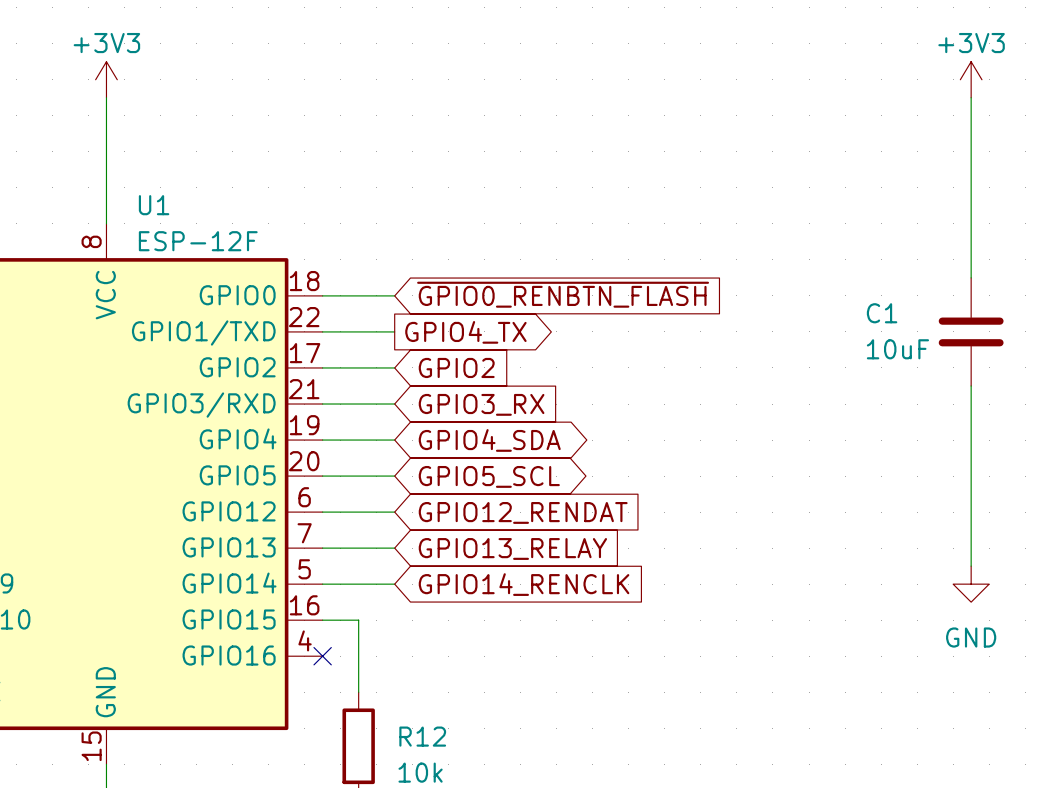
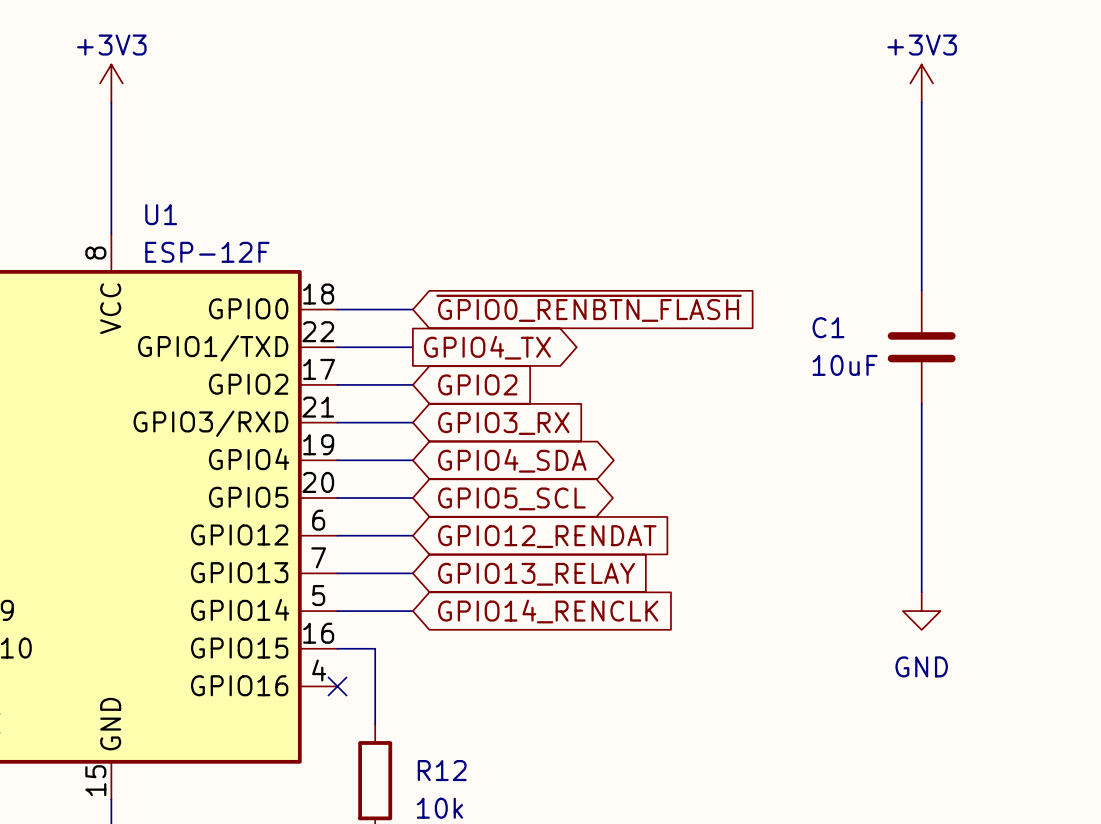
power symbol position: +3V3 (971, 79) -> +3V3 (921, 83)
wire: (971, 97) (971, 277) -> (921, 102) (921, 290)
C1 position: (971, 331) -> (921, 347)
wire: (971, 385) (971, 566) -> (921, 403) (921, 592)
power symbol position: GND (971, 584) -> GND (921, 611)

